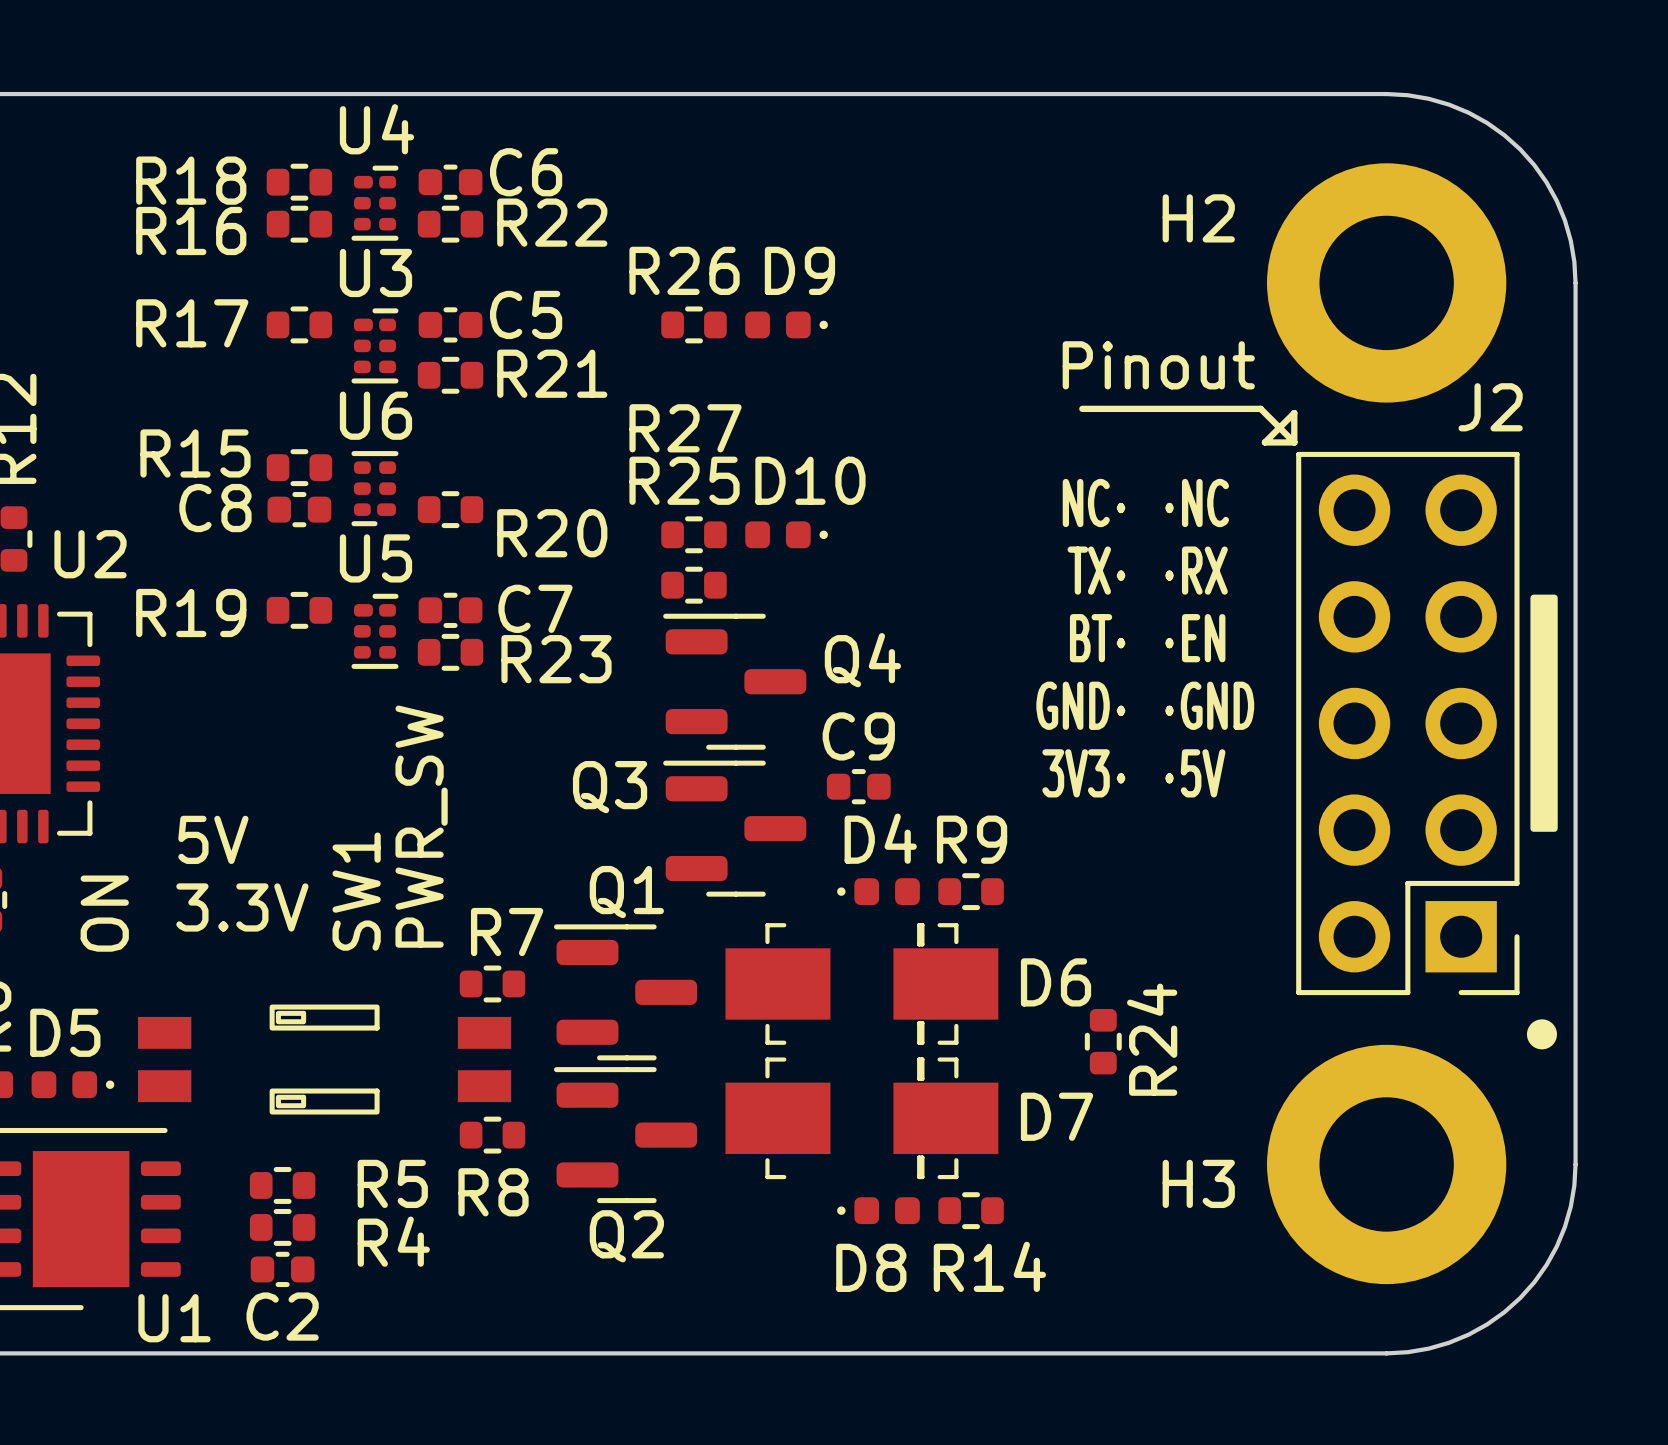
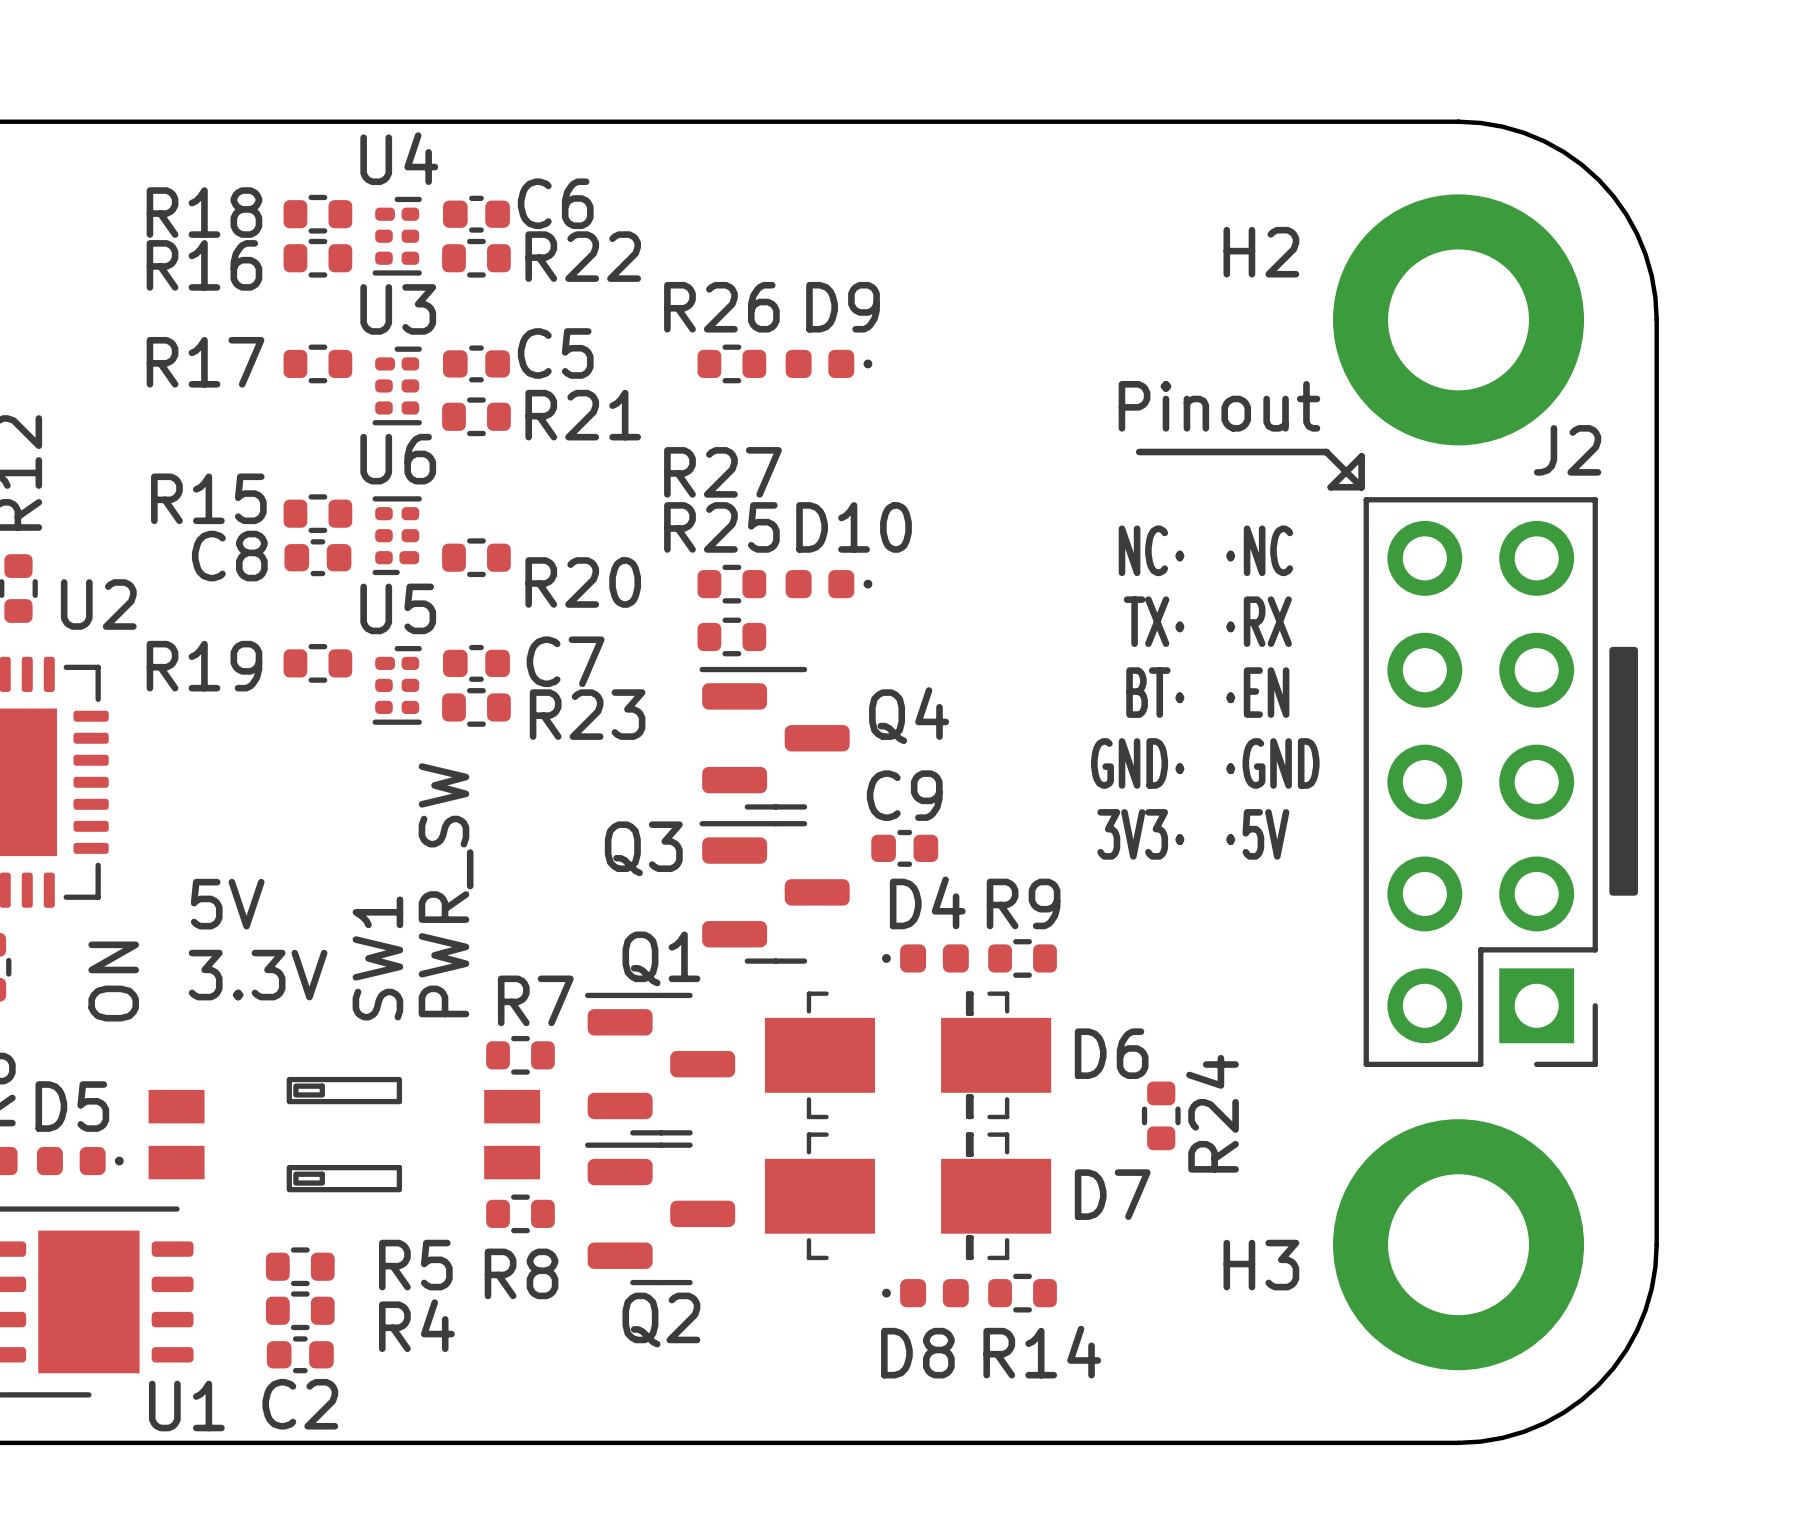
drawing: [1526, 1019, 1557, 1050] -> none

